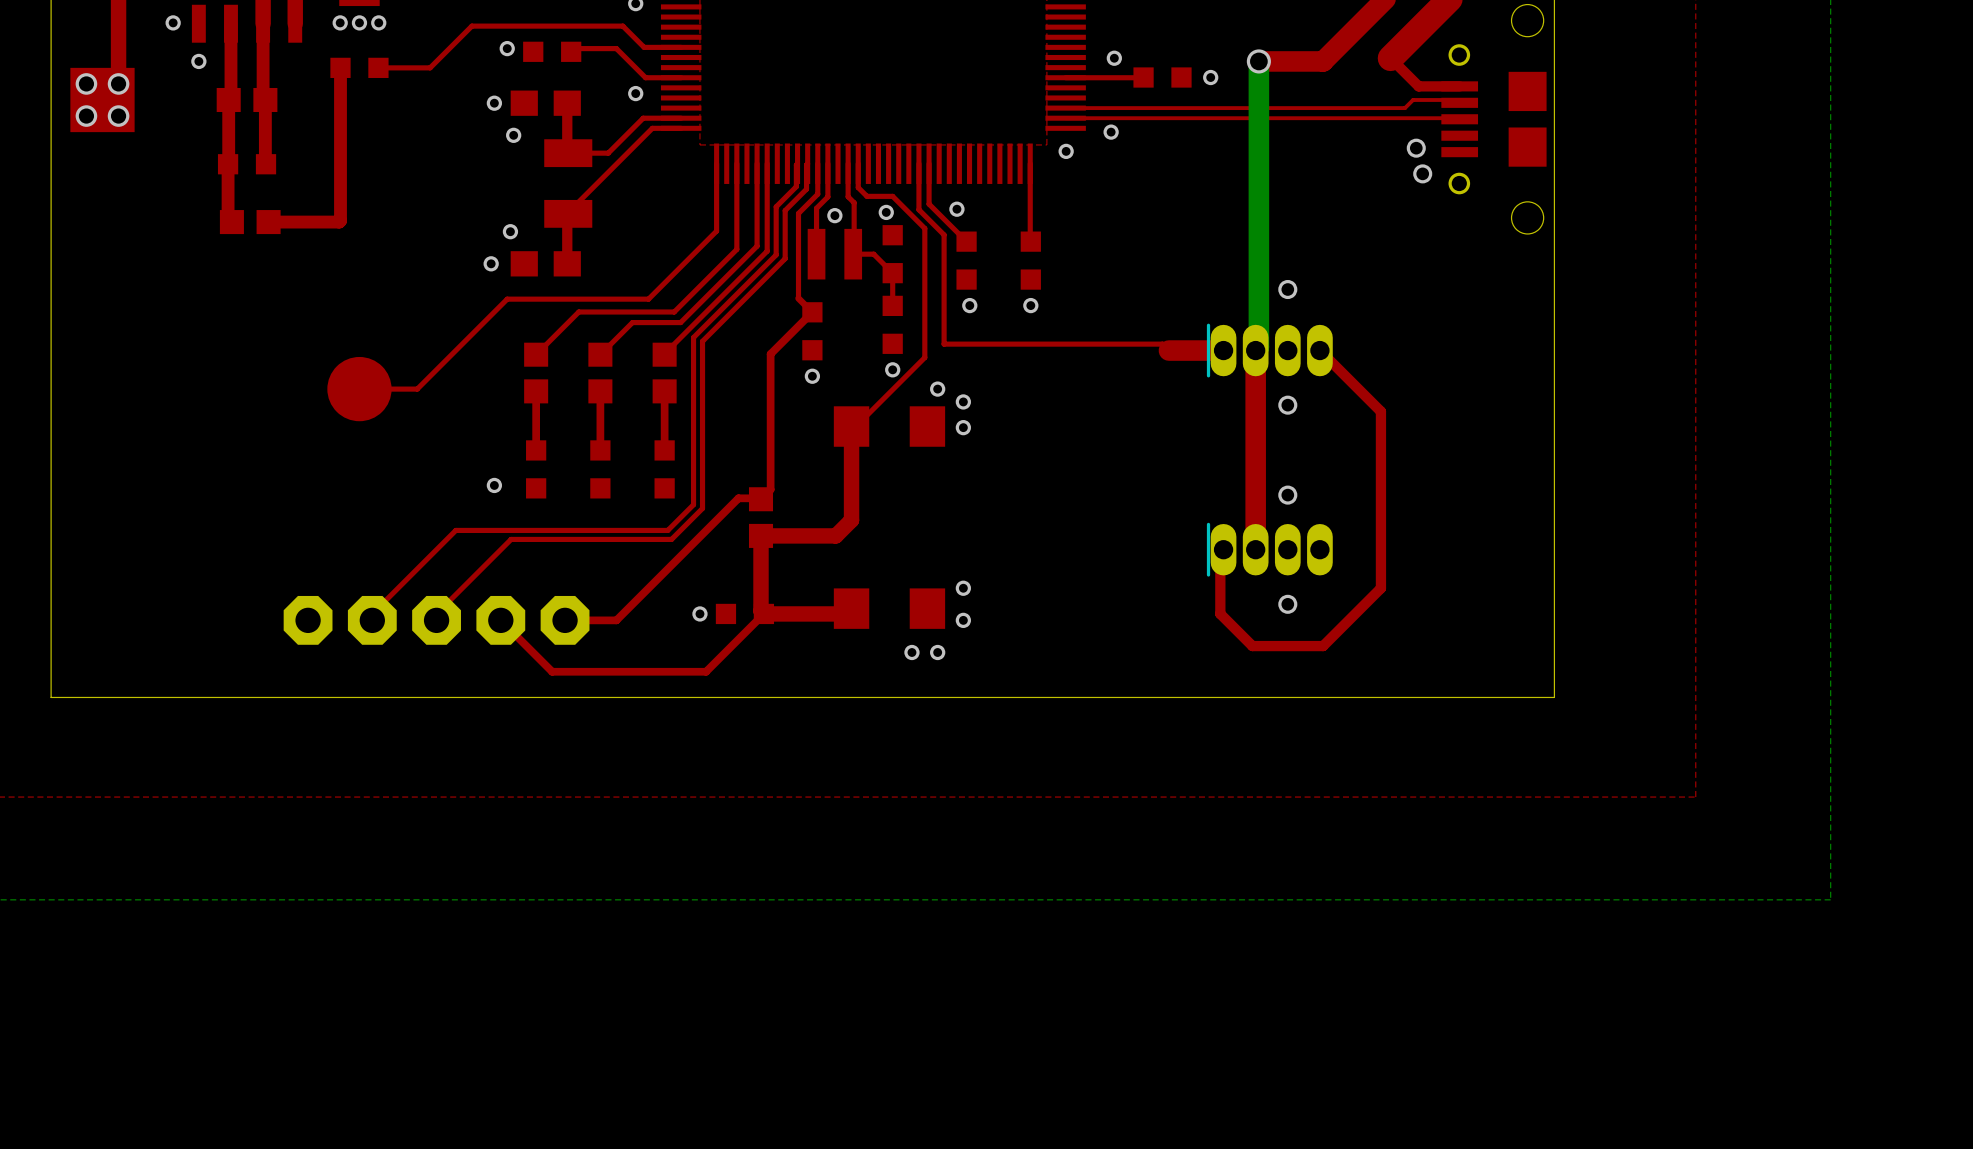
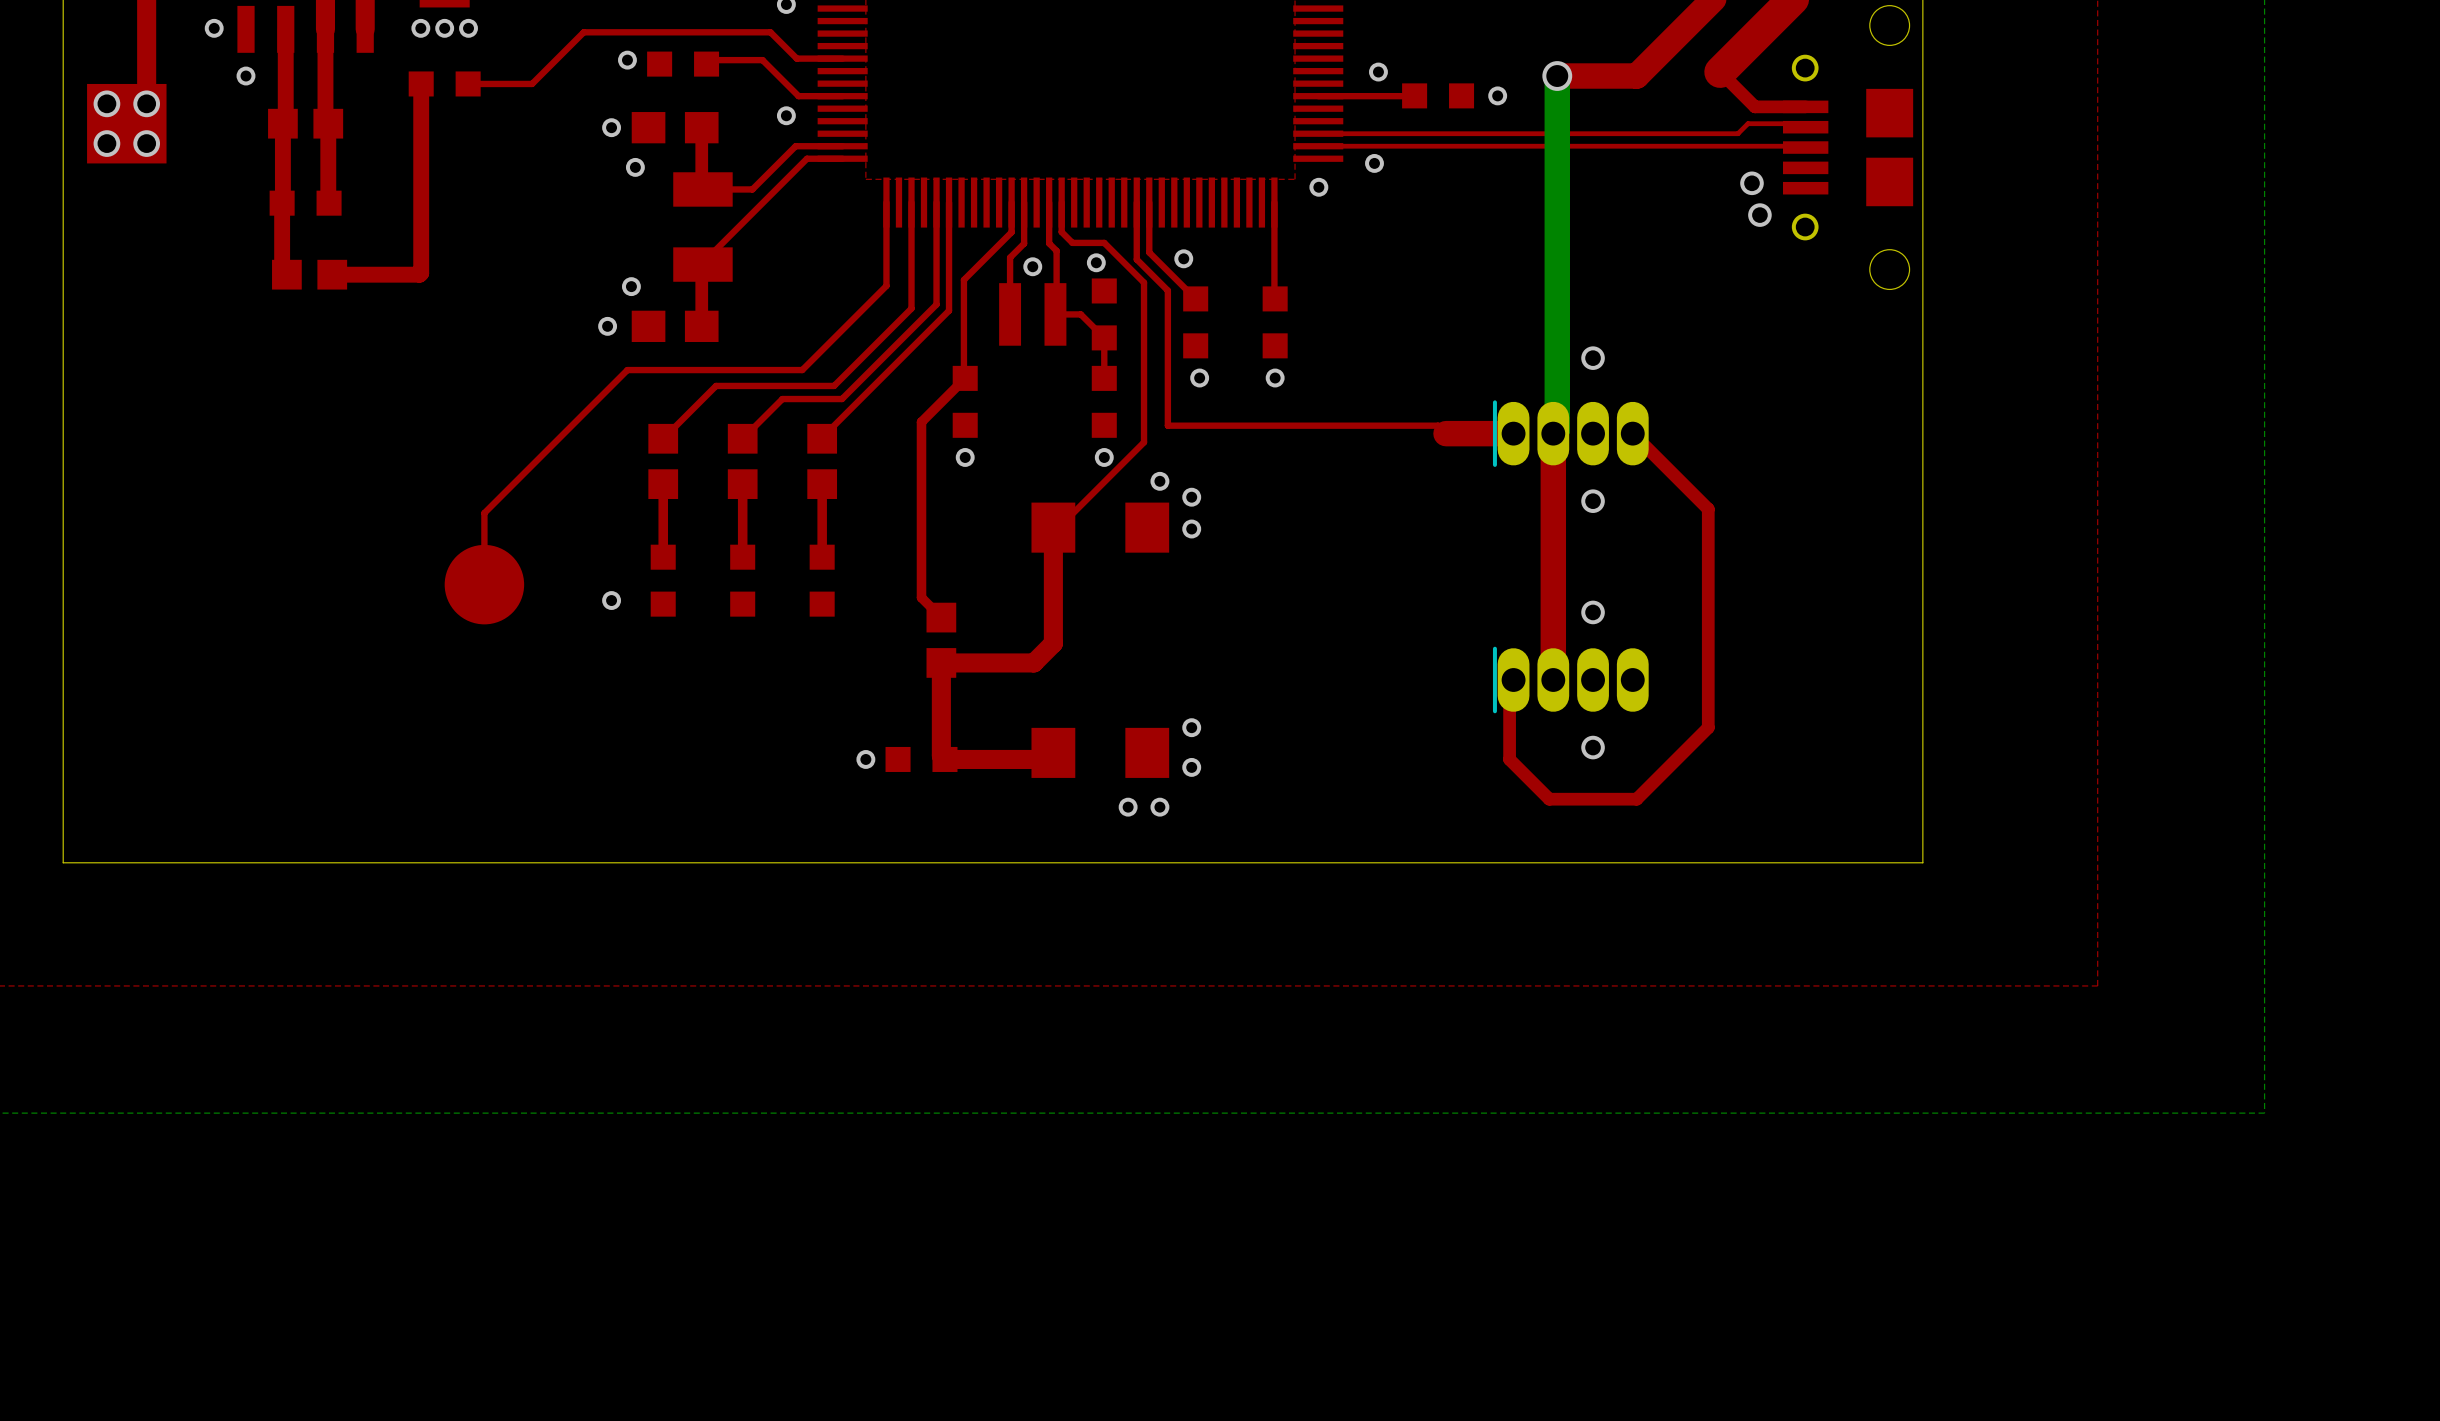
top track: (797, 163) (796, 186) (776, 206) (776, 254) (693, 337) (693, 504) (667, 530) (455, 530) (372, 613) (372, 620) -> none
top track: (807, 163) (806, 189) (785, 210) (785, 258) (702, 341) (702, 508) (671, 539) (511, 539) (436, 613) (436, 620) -> none
top track: (817, 187) (817, 194) (798, 213) (798, 298) (812, 312) (770, 354) (770, 489) (761, 499) -> (1011, 232) (963, 279) (965, 378) (921, 422) (921, 597) (940, 616)
part position: (812, 331) -> (965, 401)
via position: (812, 376) -> (965, 457)
part position: (359, 389) -> (484, 584)
top track: (417, 389) (359, 389) -> (516, 481) (484, 513) (484, 584)
top track: (760, 498) (738, 498) (616, 620) (565, 620) -> none
top track: (763, 613) (706, 671) (552, 671) (500, 620) -> none
part: (436, 620) -> none

